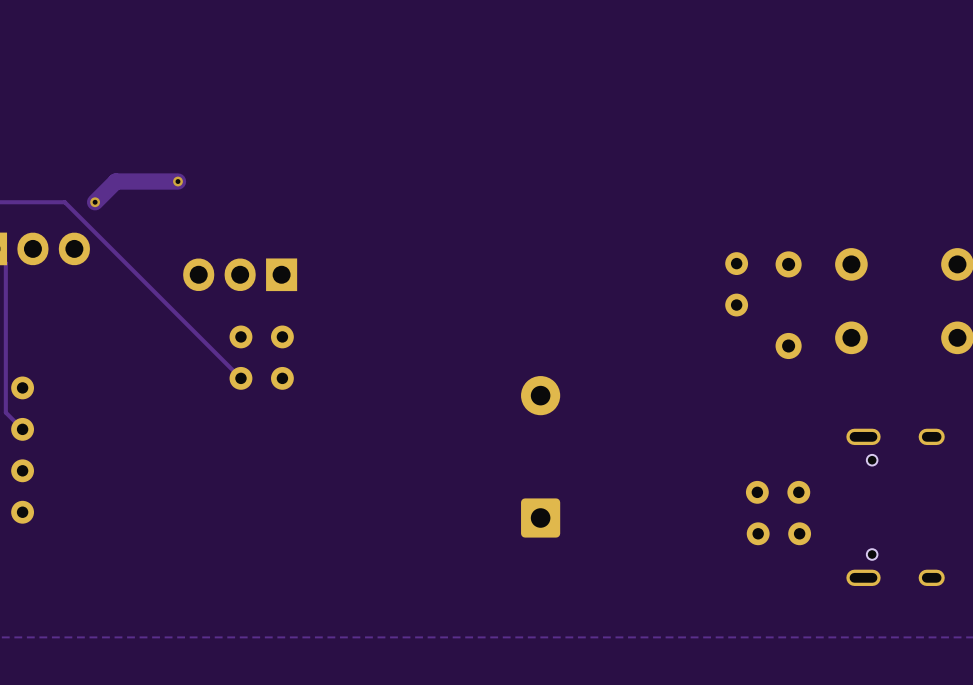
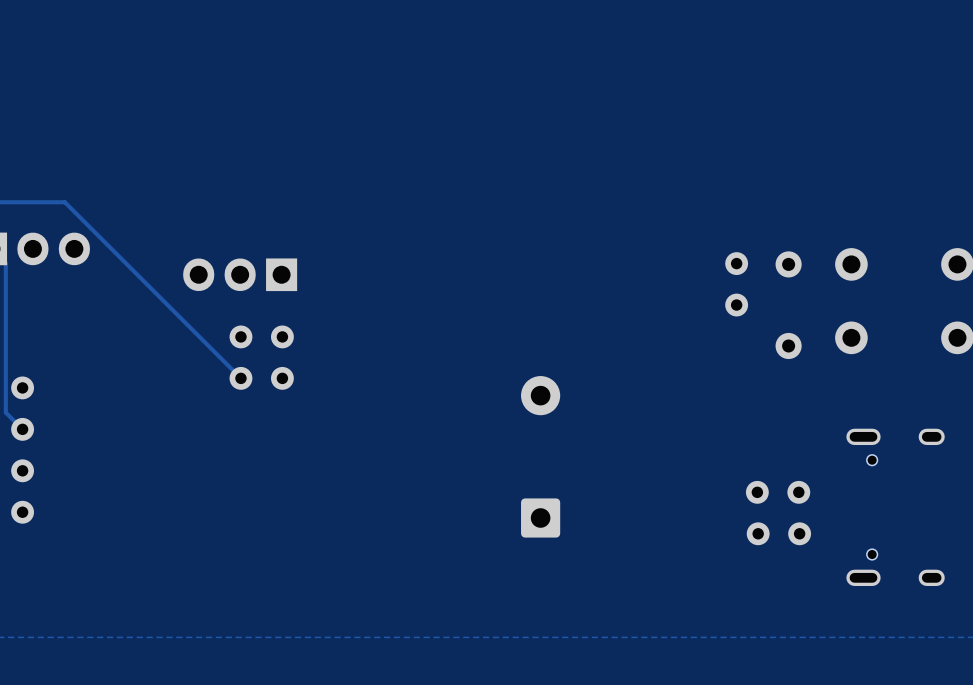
track: (177, 181) (115, 181) (95, 202) -> none
via: (177, 181) -> none
via: (95, 202) -> none

